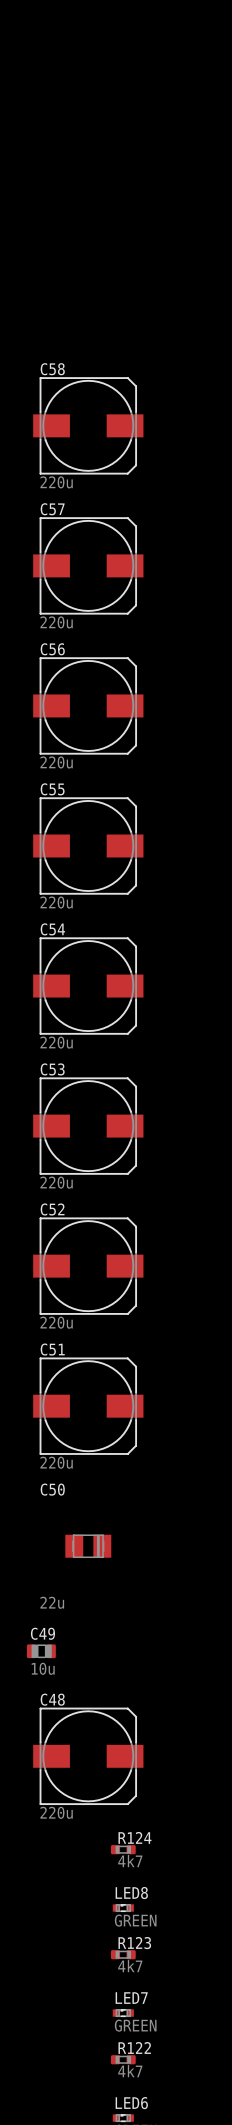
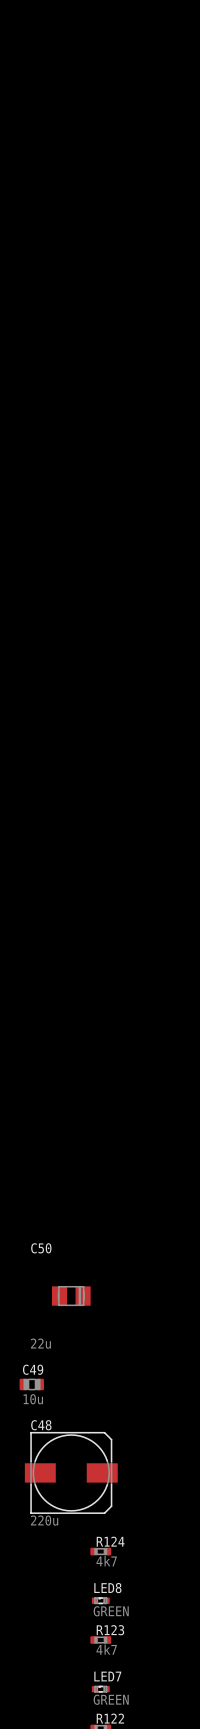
C58: 220u (88, 425) -> none
C57: 220u (88, 565) -> none
C56: 220u (88, 705) -> none
C55: 220u (88, 845) -> none
C54: 220u (88, 986) -> none
C53: 220u (88, 1126) -> none
C52: 220u (88, 1266) -> none
C51: 220u (88, 1406) -> none

